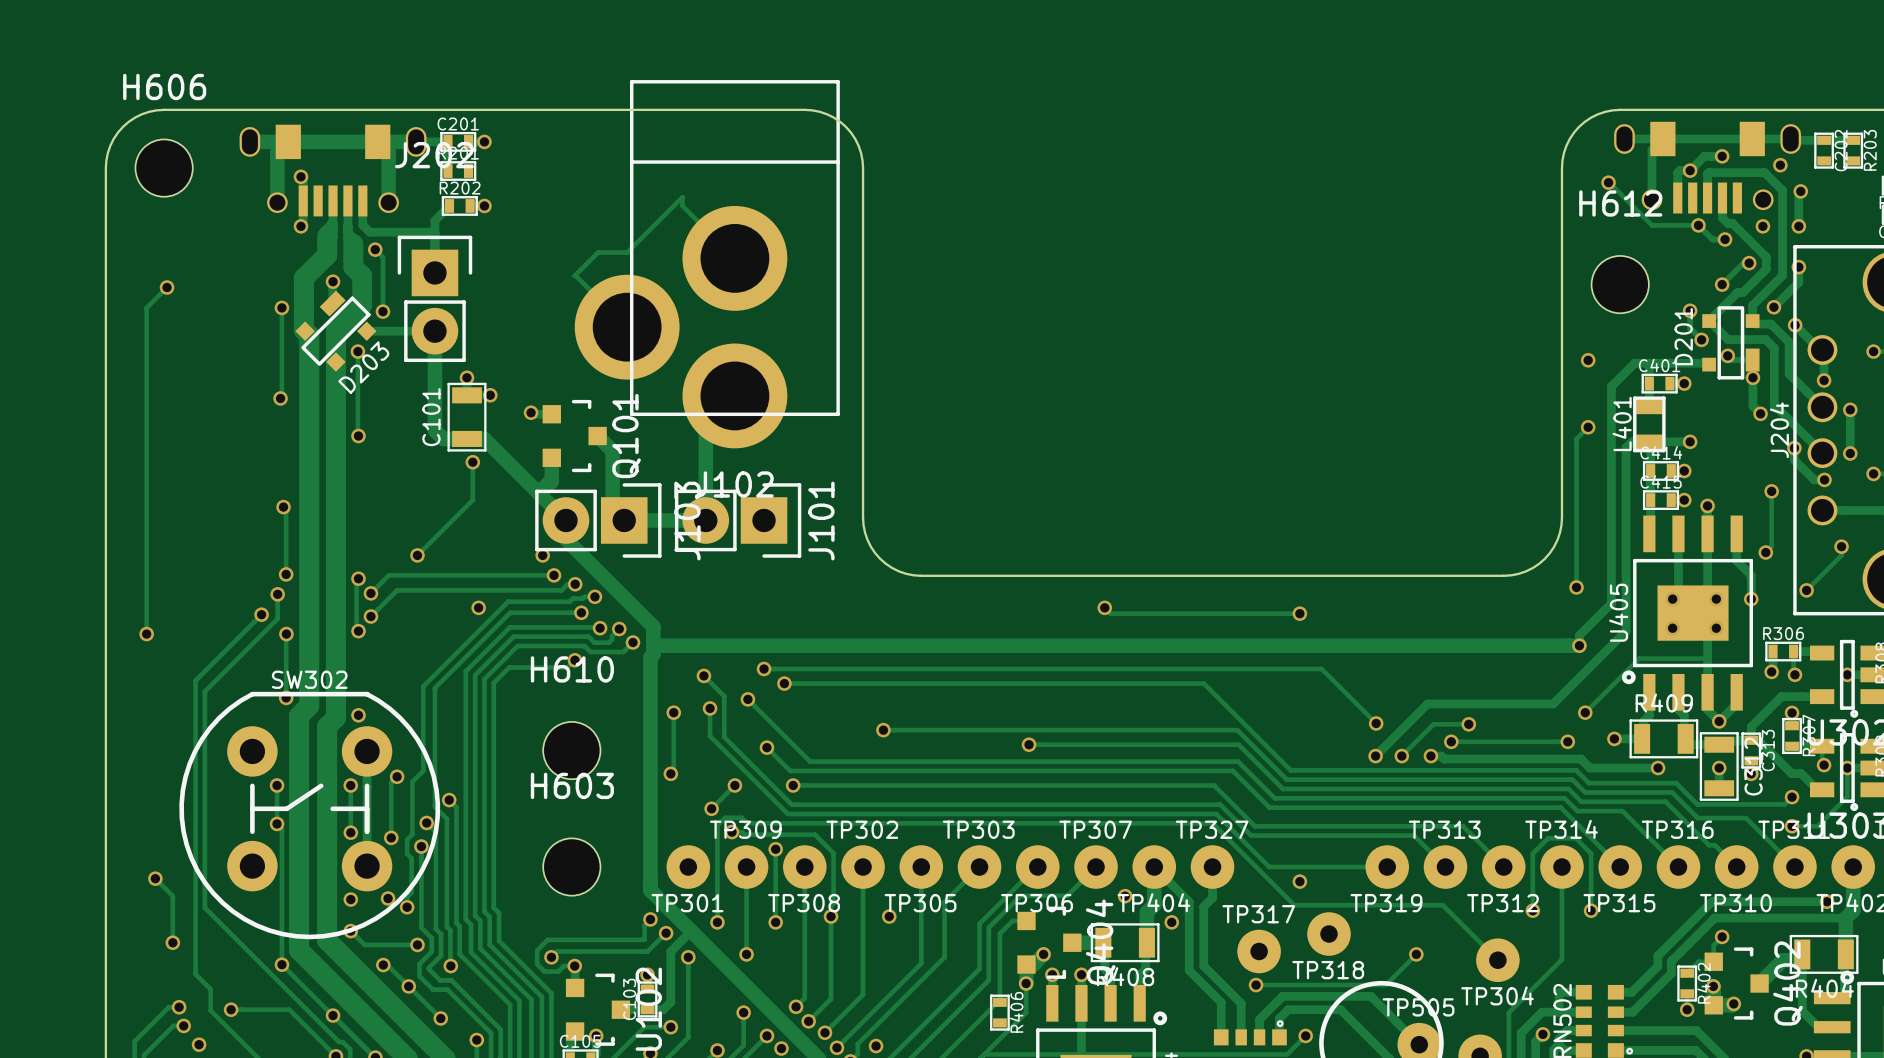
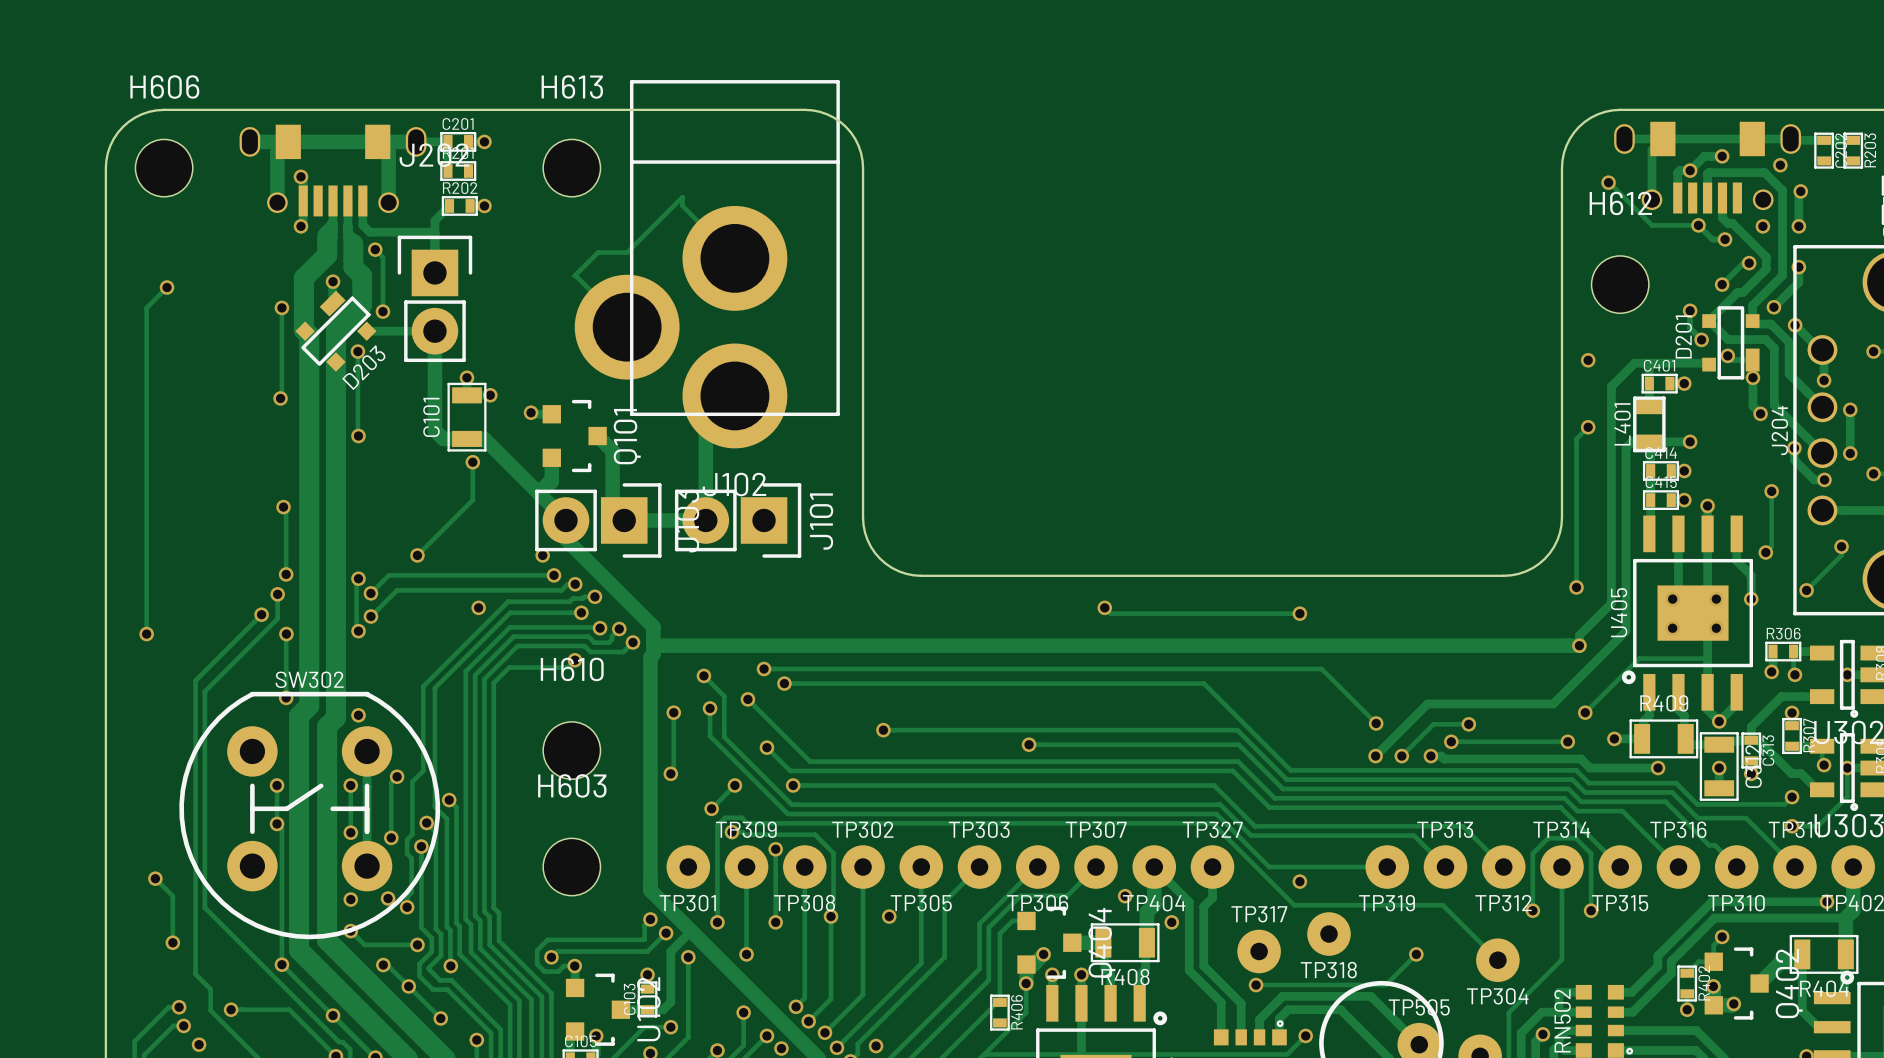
H613: none -> (571, 168)

